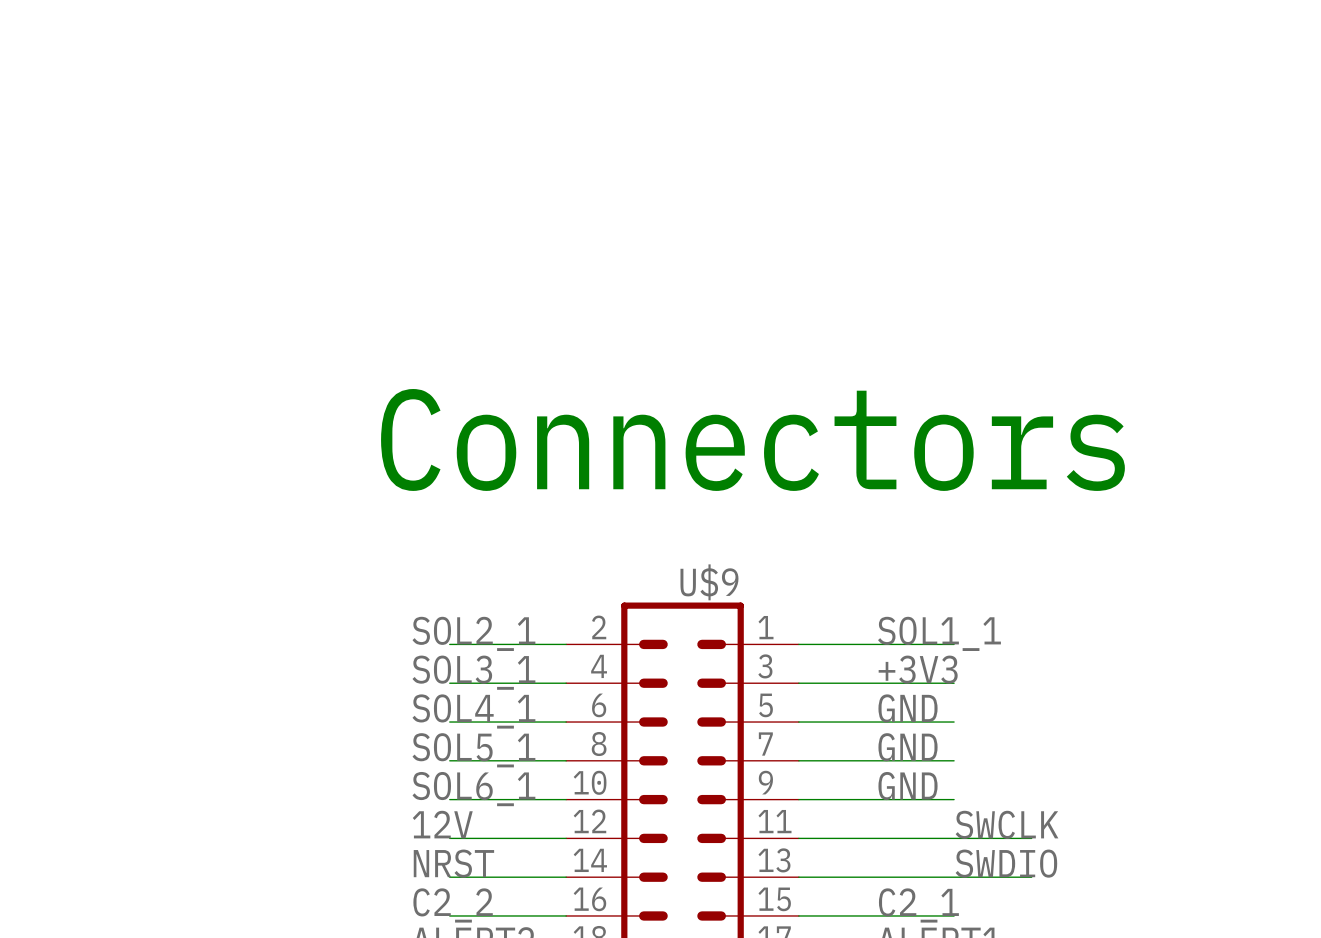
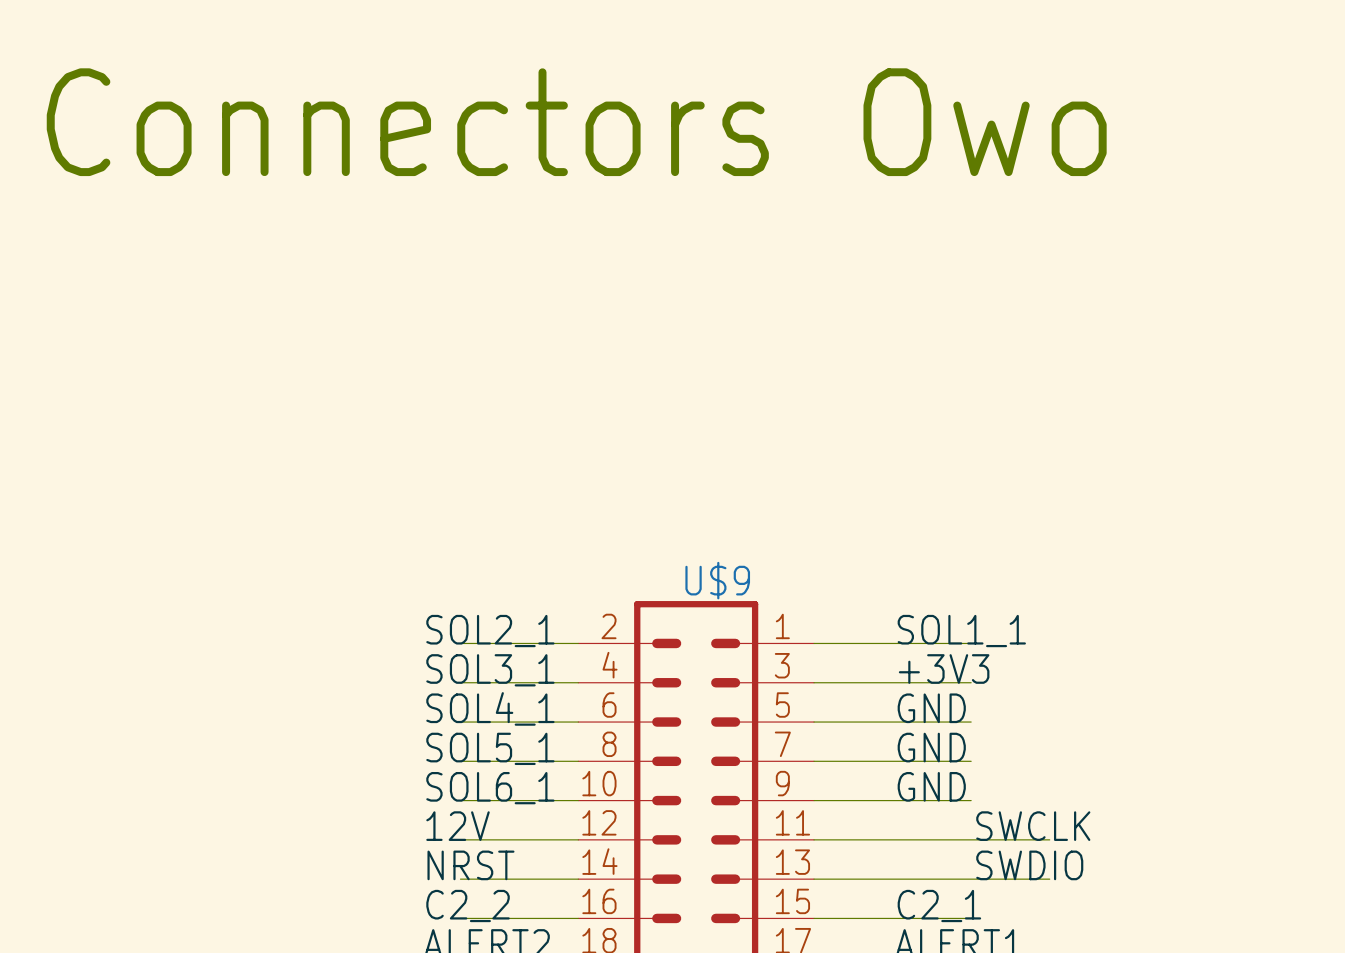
text: none -> Connectors Owo (576, 122)
text: Connectors (752, 439) -> none

